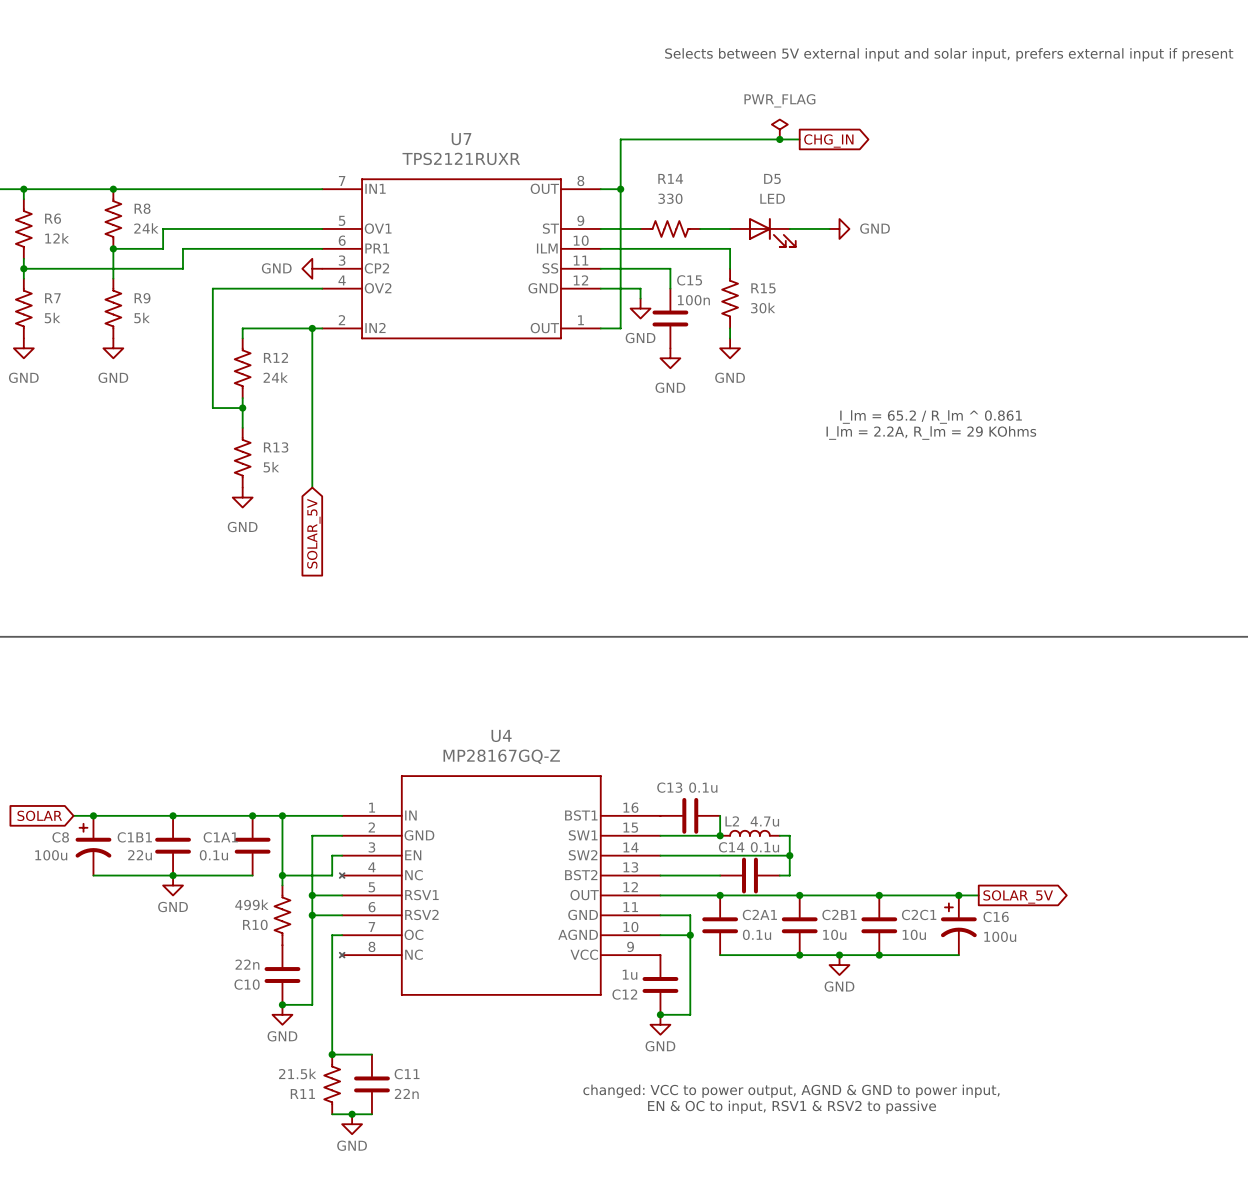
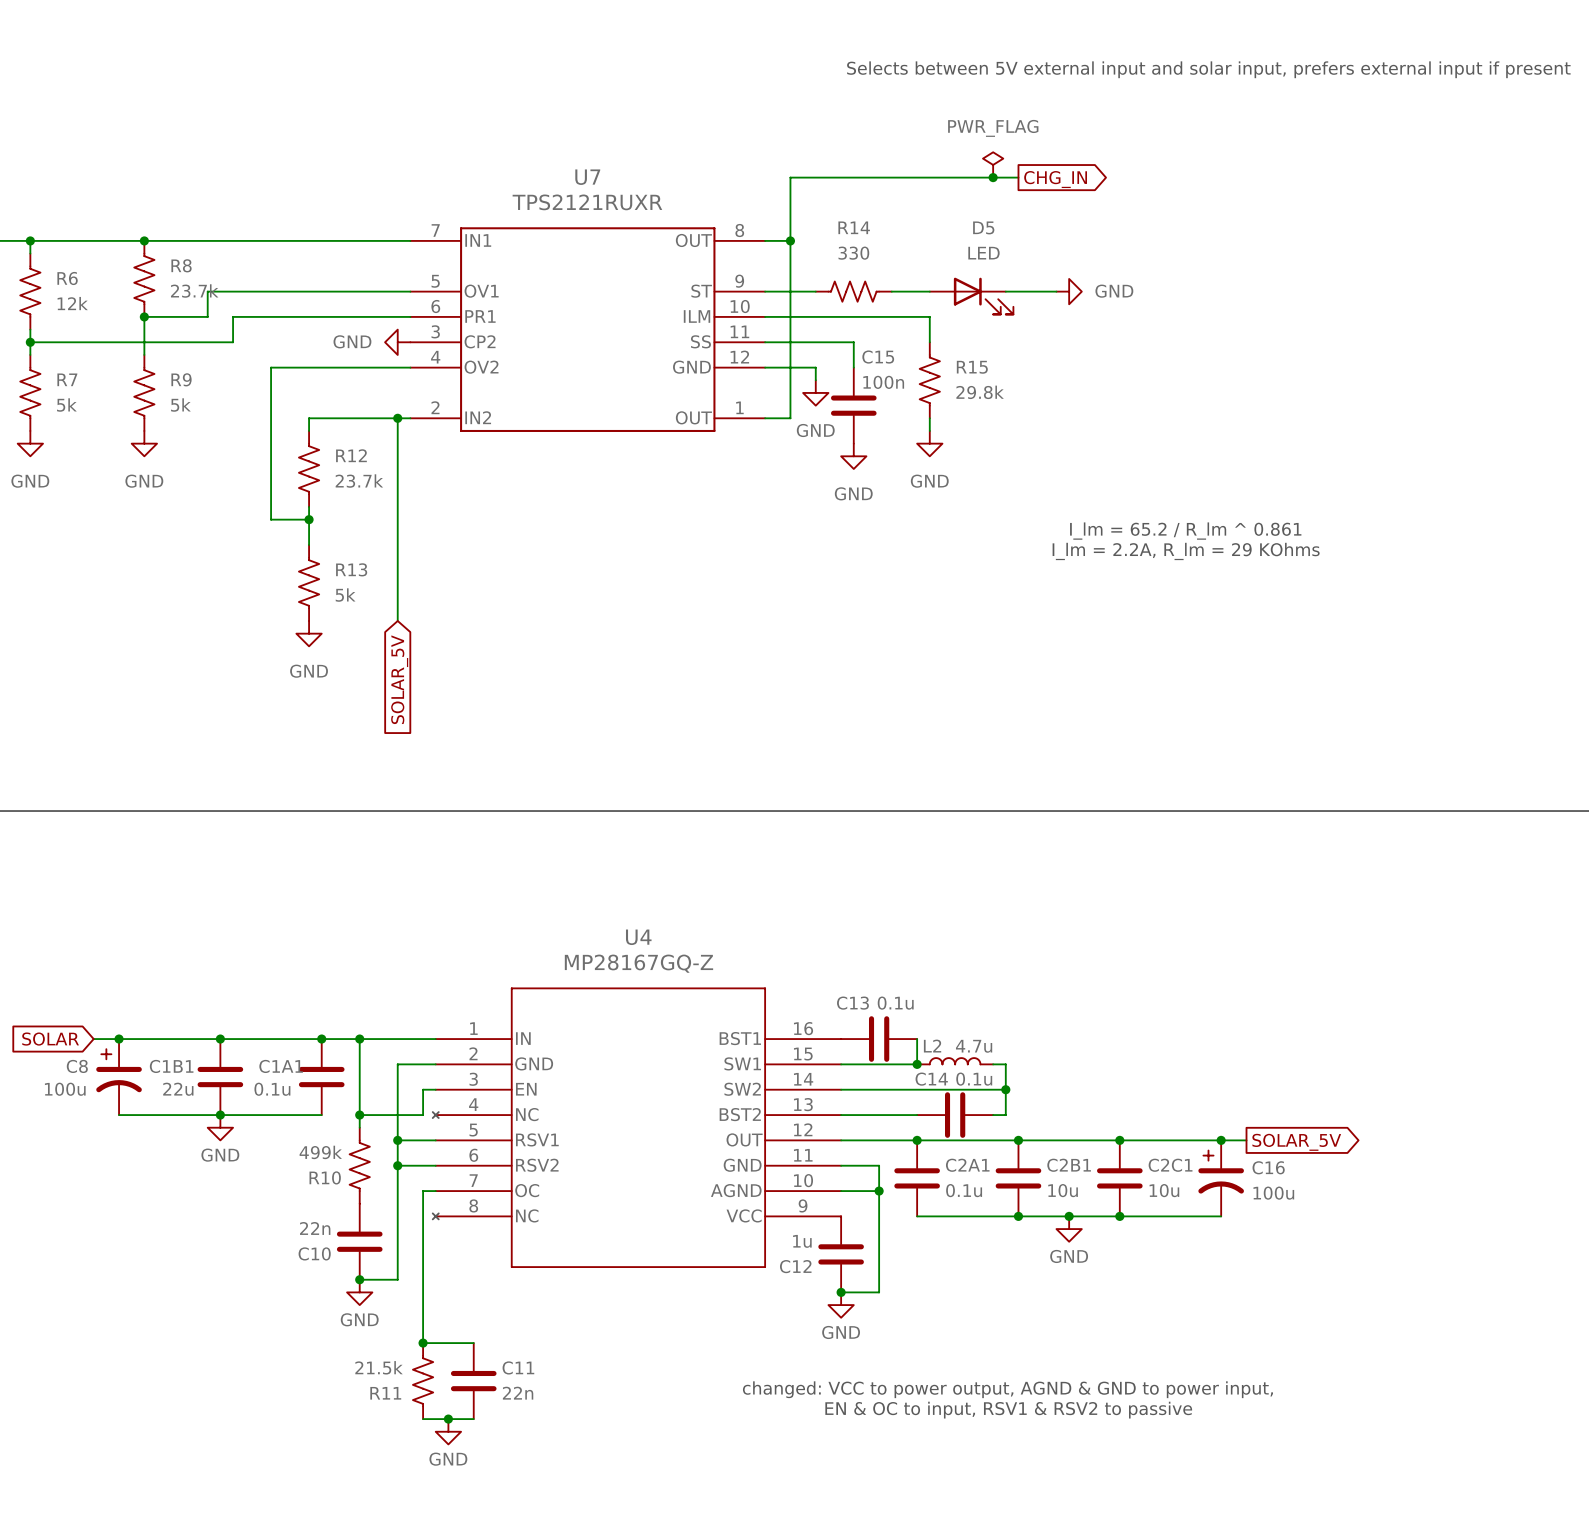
R8 value: 24k (146, 228) -> 23.7k (194, 291)
R15 value: 30k (763, 308) -> 29.8k (980, 392)
R12 value: 24k (275, 377) -> 23.7k (359, 481)

